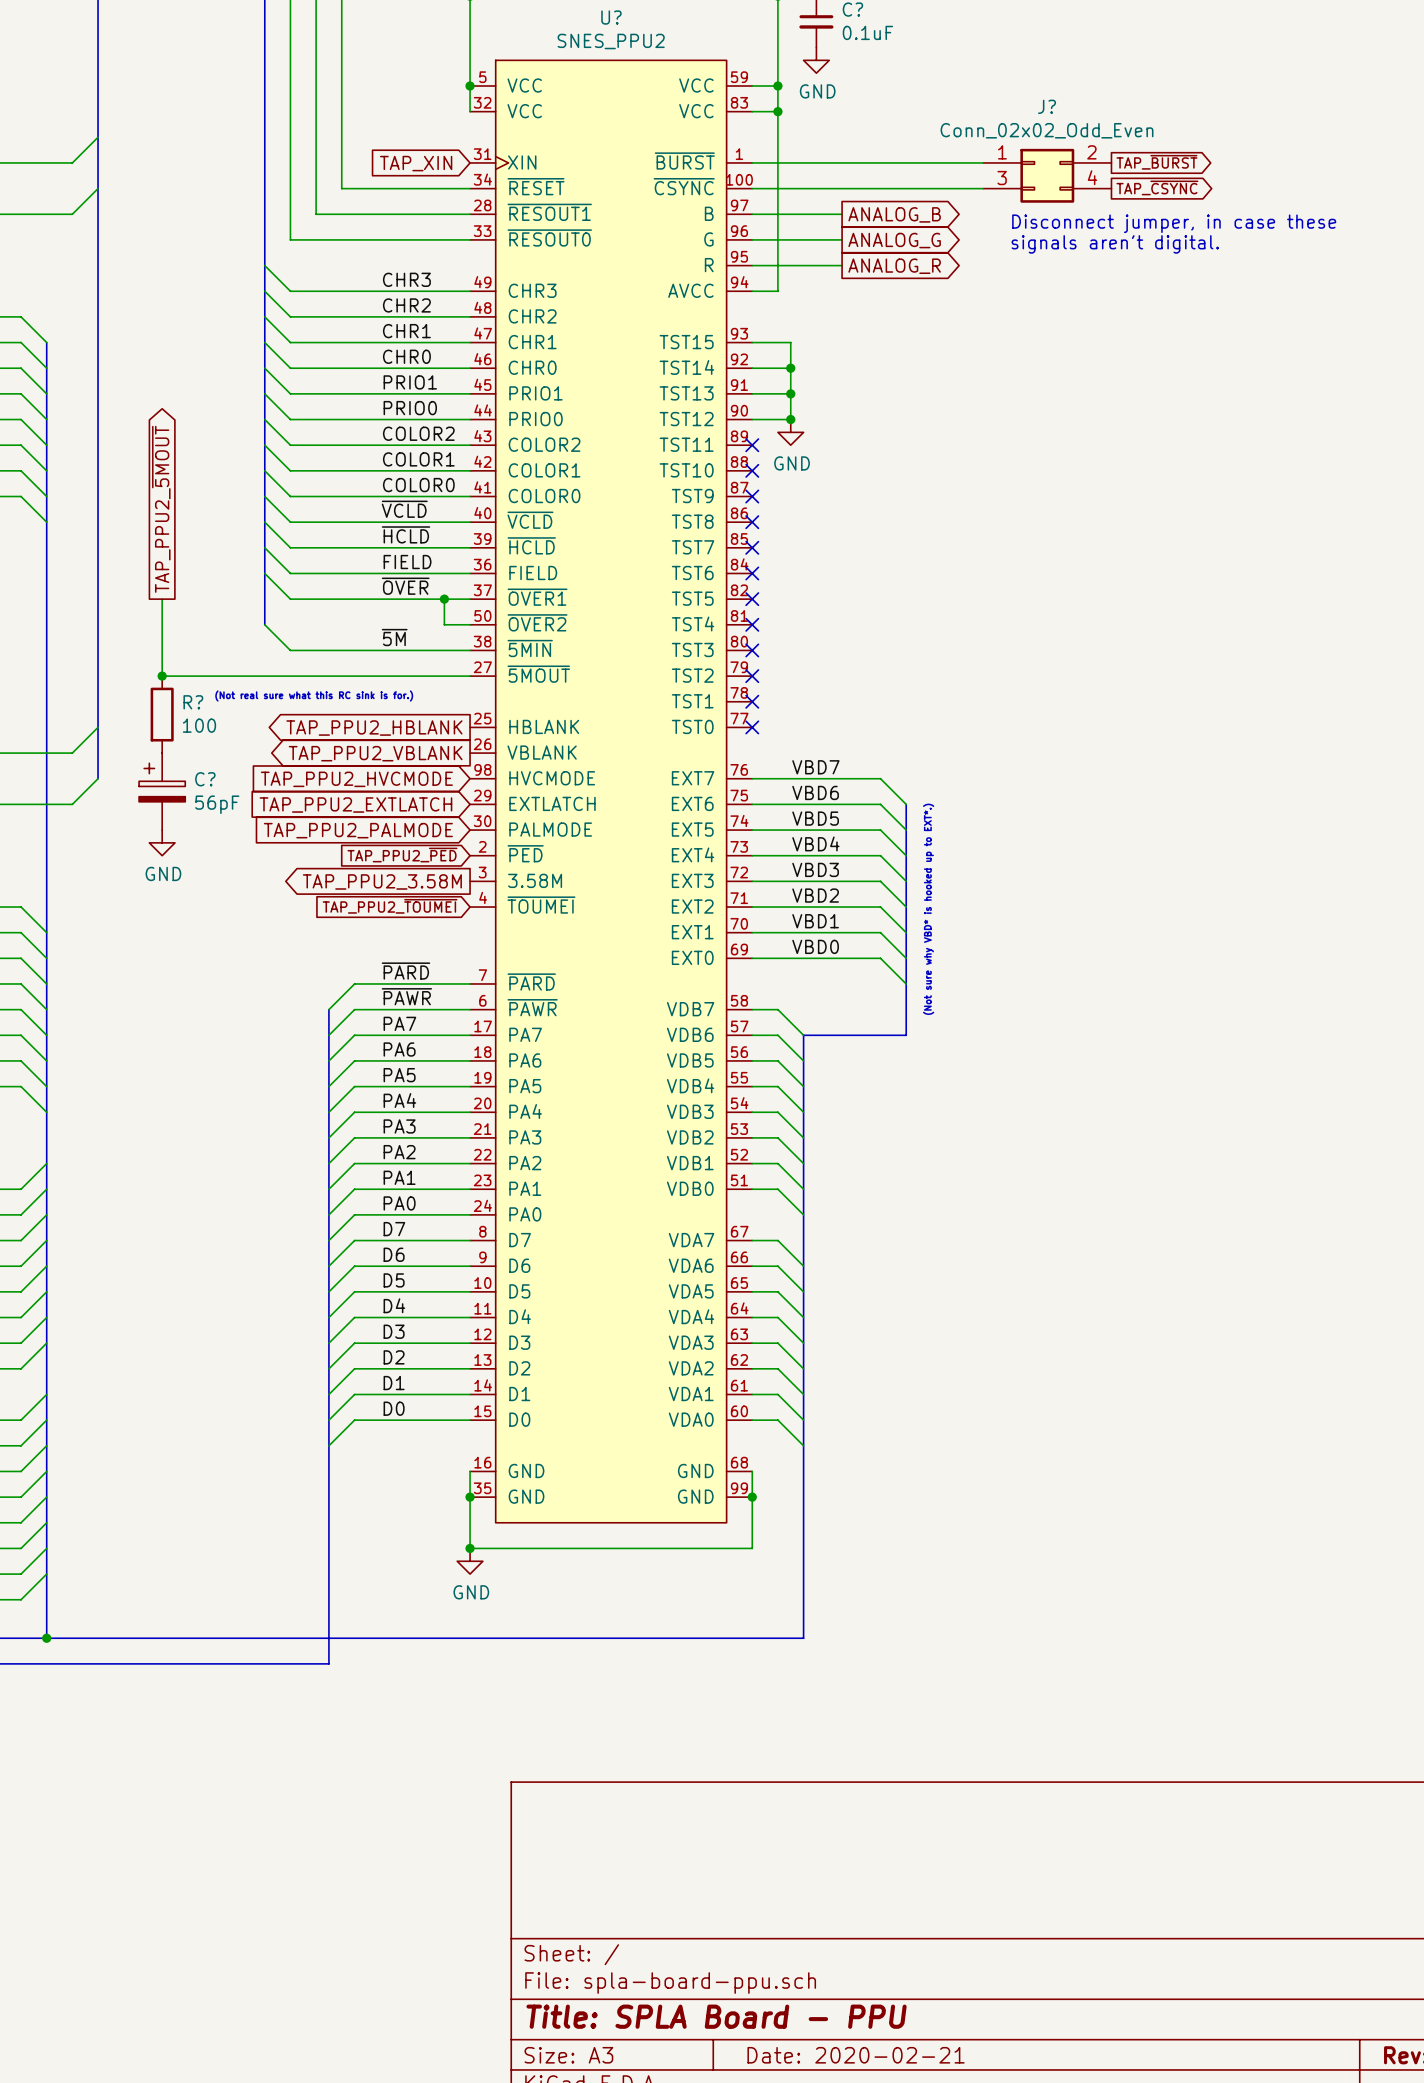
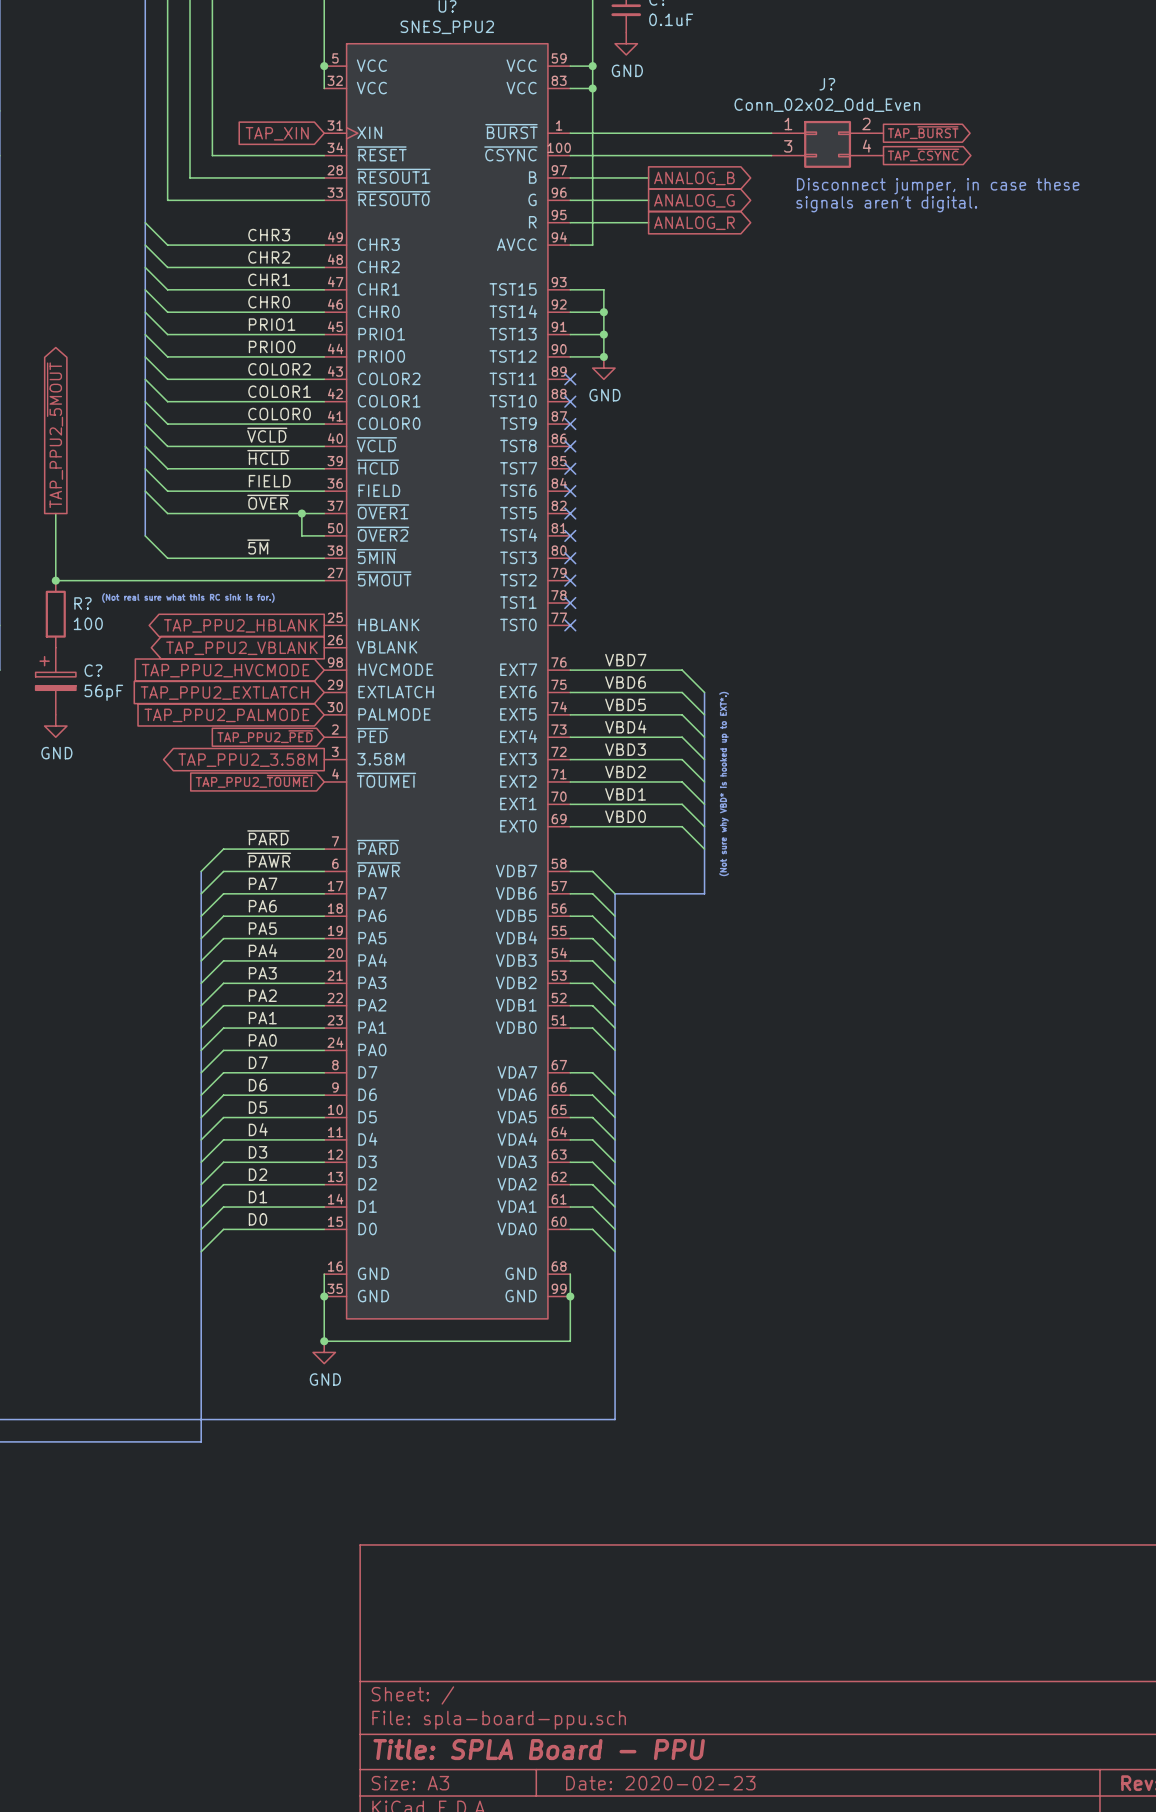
title block: Date: 2020-02-21 (856, 2055) -> Date: 2020-02-23 (660, 1783)

